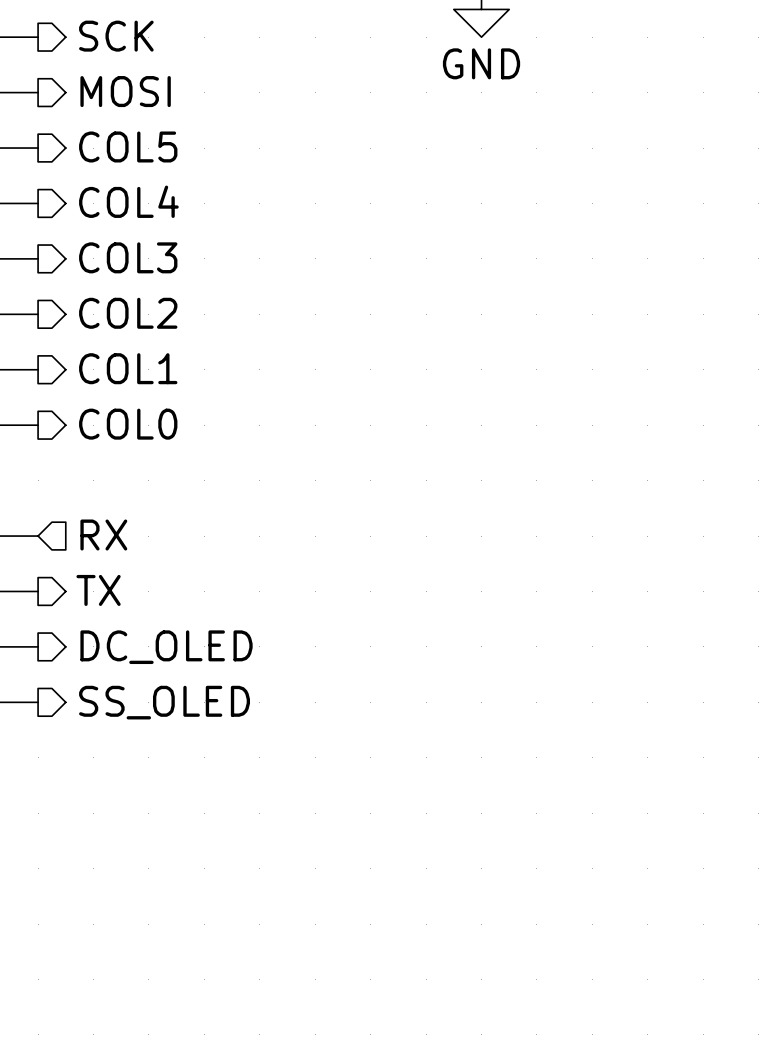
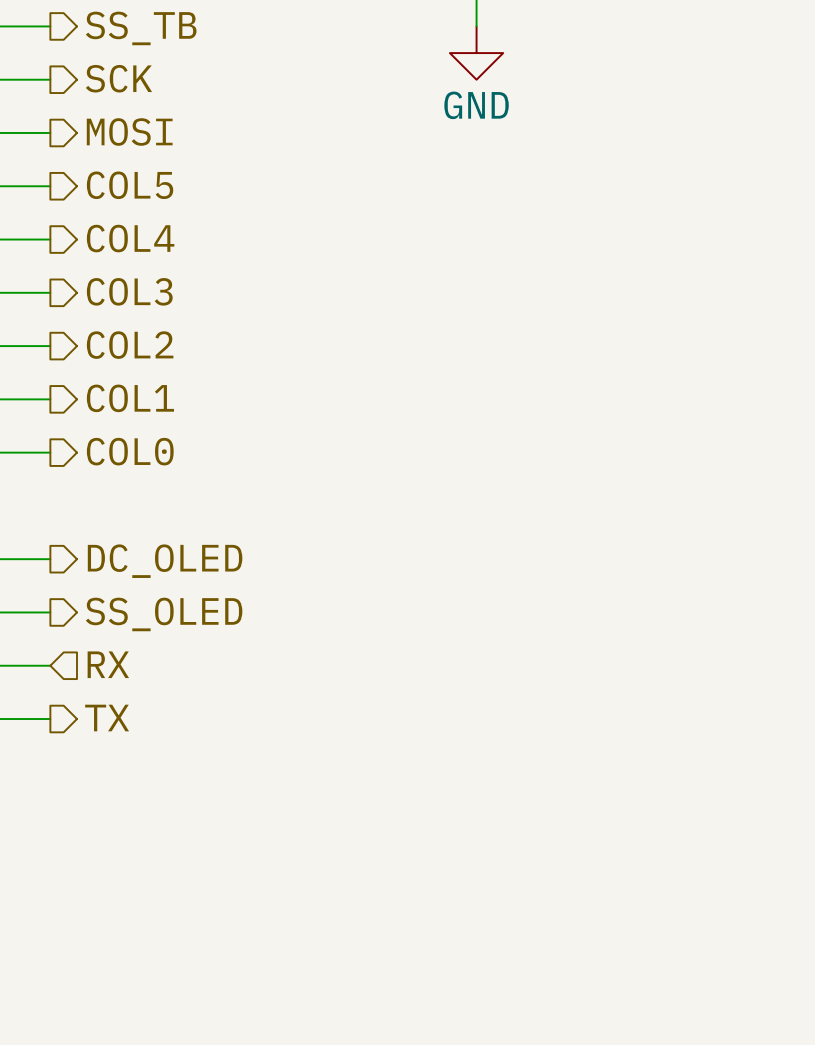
hierarchical label shape: input (103, 535) -> output (165, 561)
hierarchical label: RX (103, 535) -> DC_OLED (165, 561)
hierarchical label: TX (98, 590) -> SS_OLED (164, 614)
hierarchical label shape: output (166, 647) -> input (108, 664)
hierarchical label: DC_OLED (166, 647) -> RX (108, 664)
hierarchical label: SS_OLED (164, 702) -> TX (107, 718)

